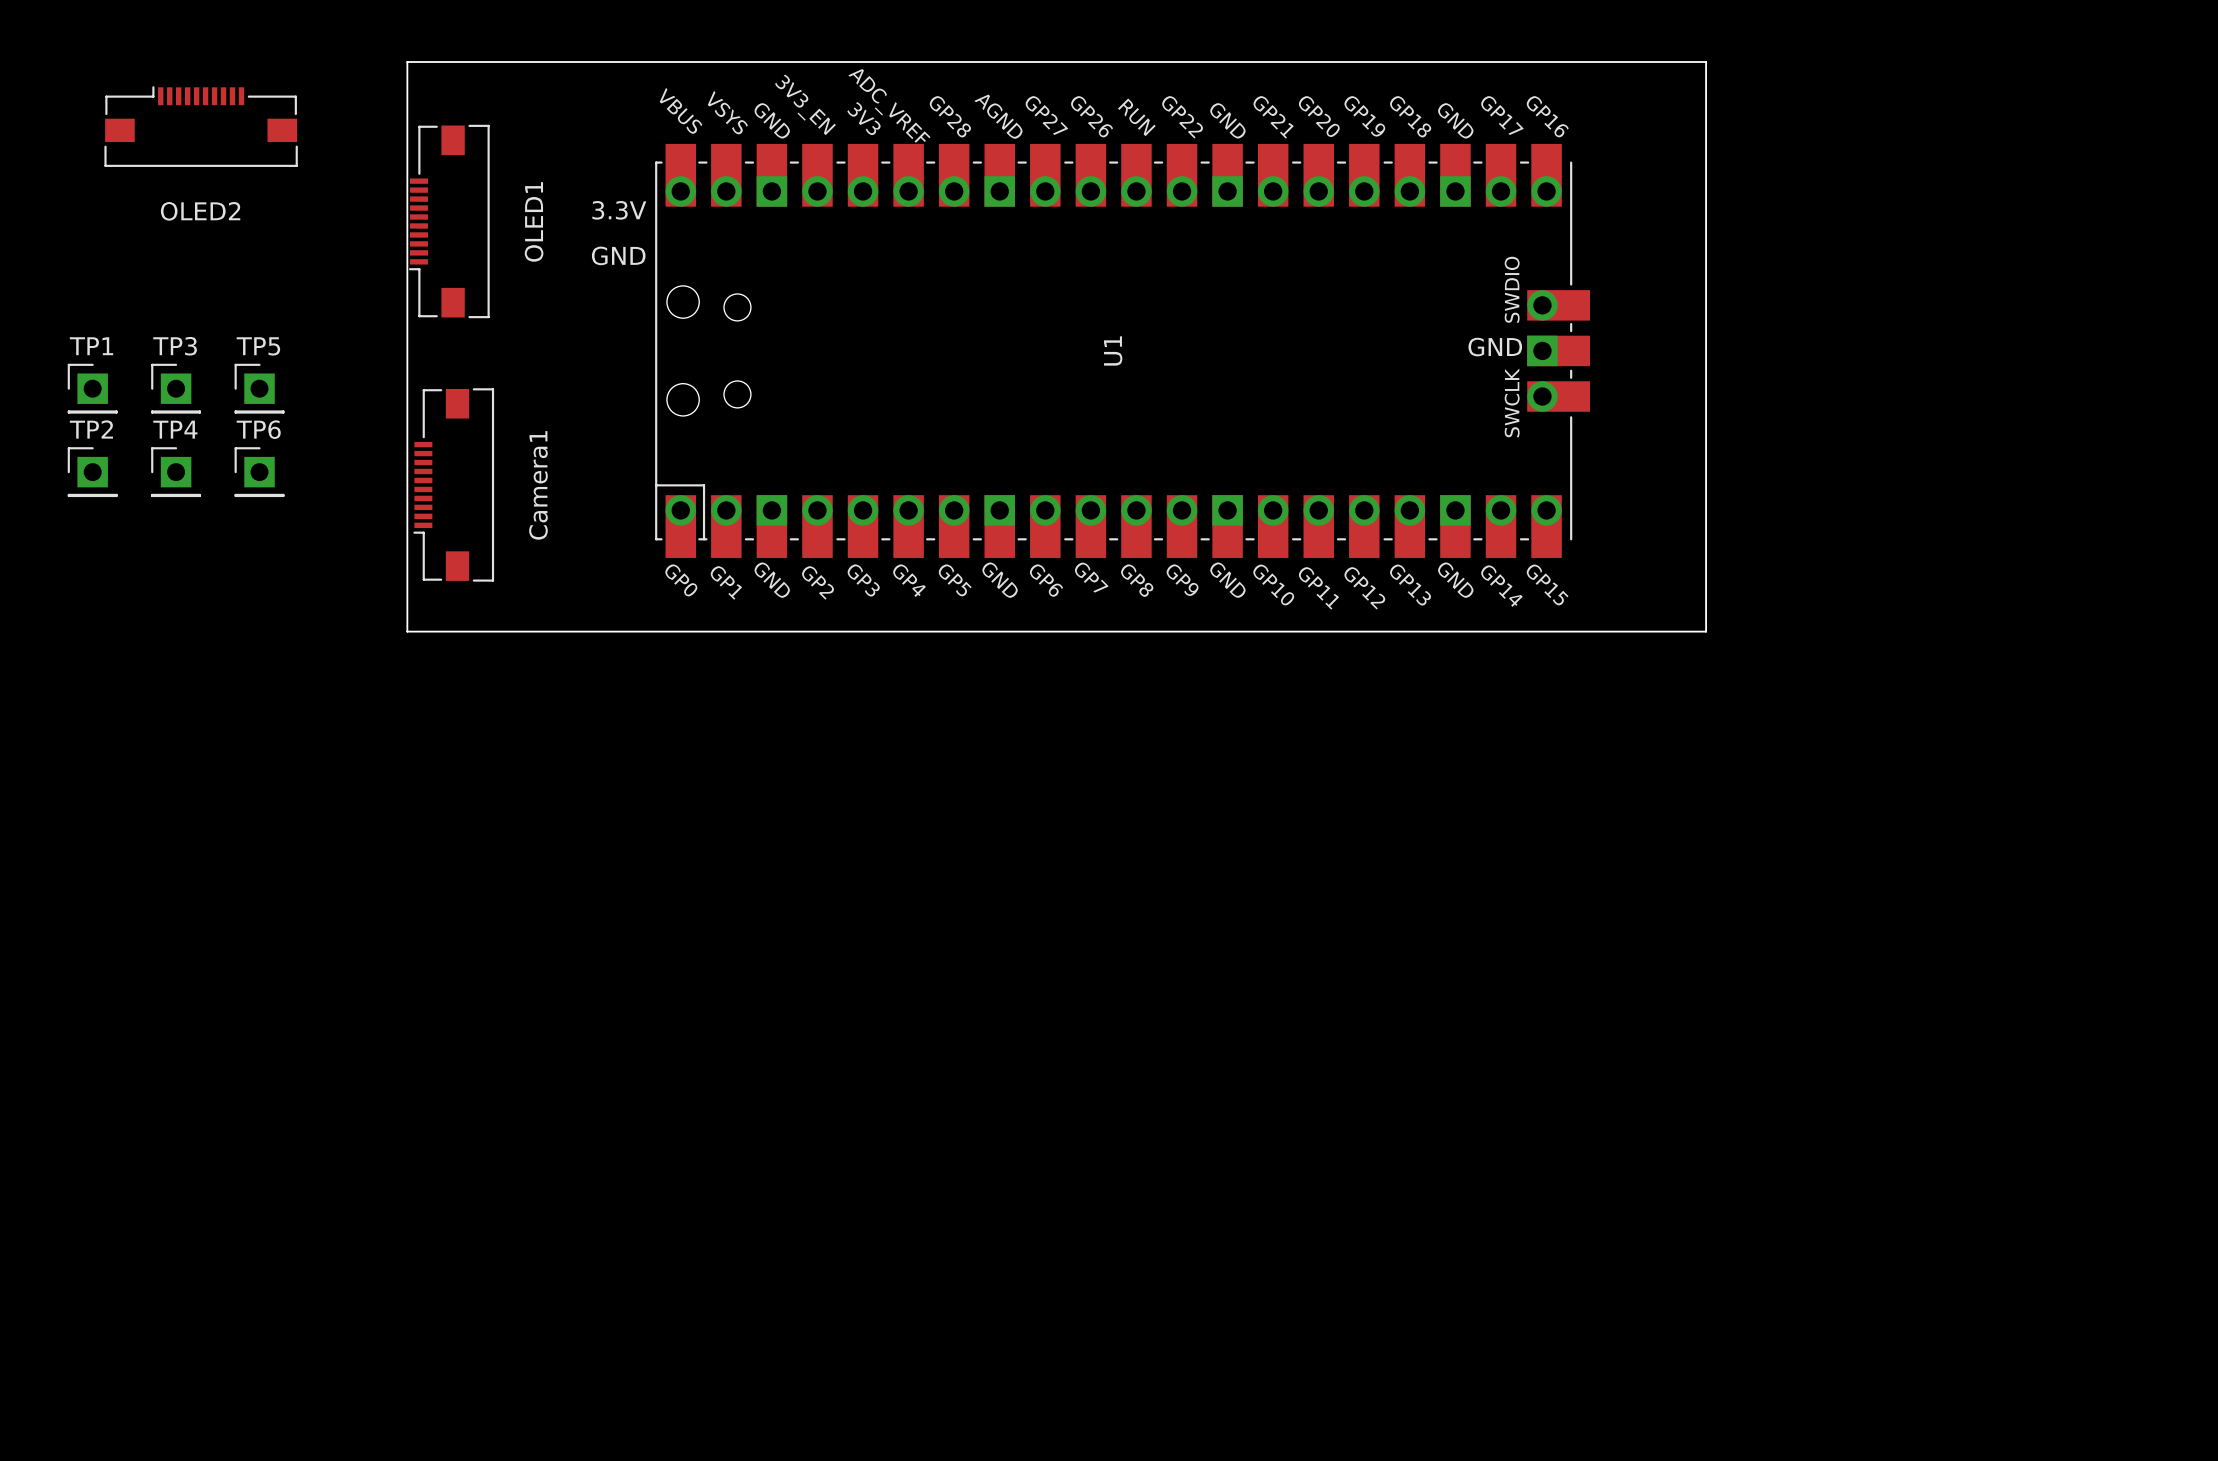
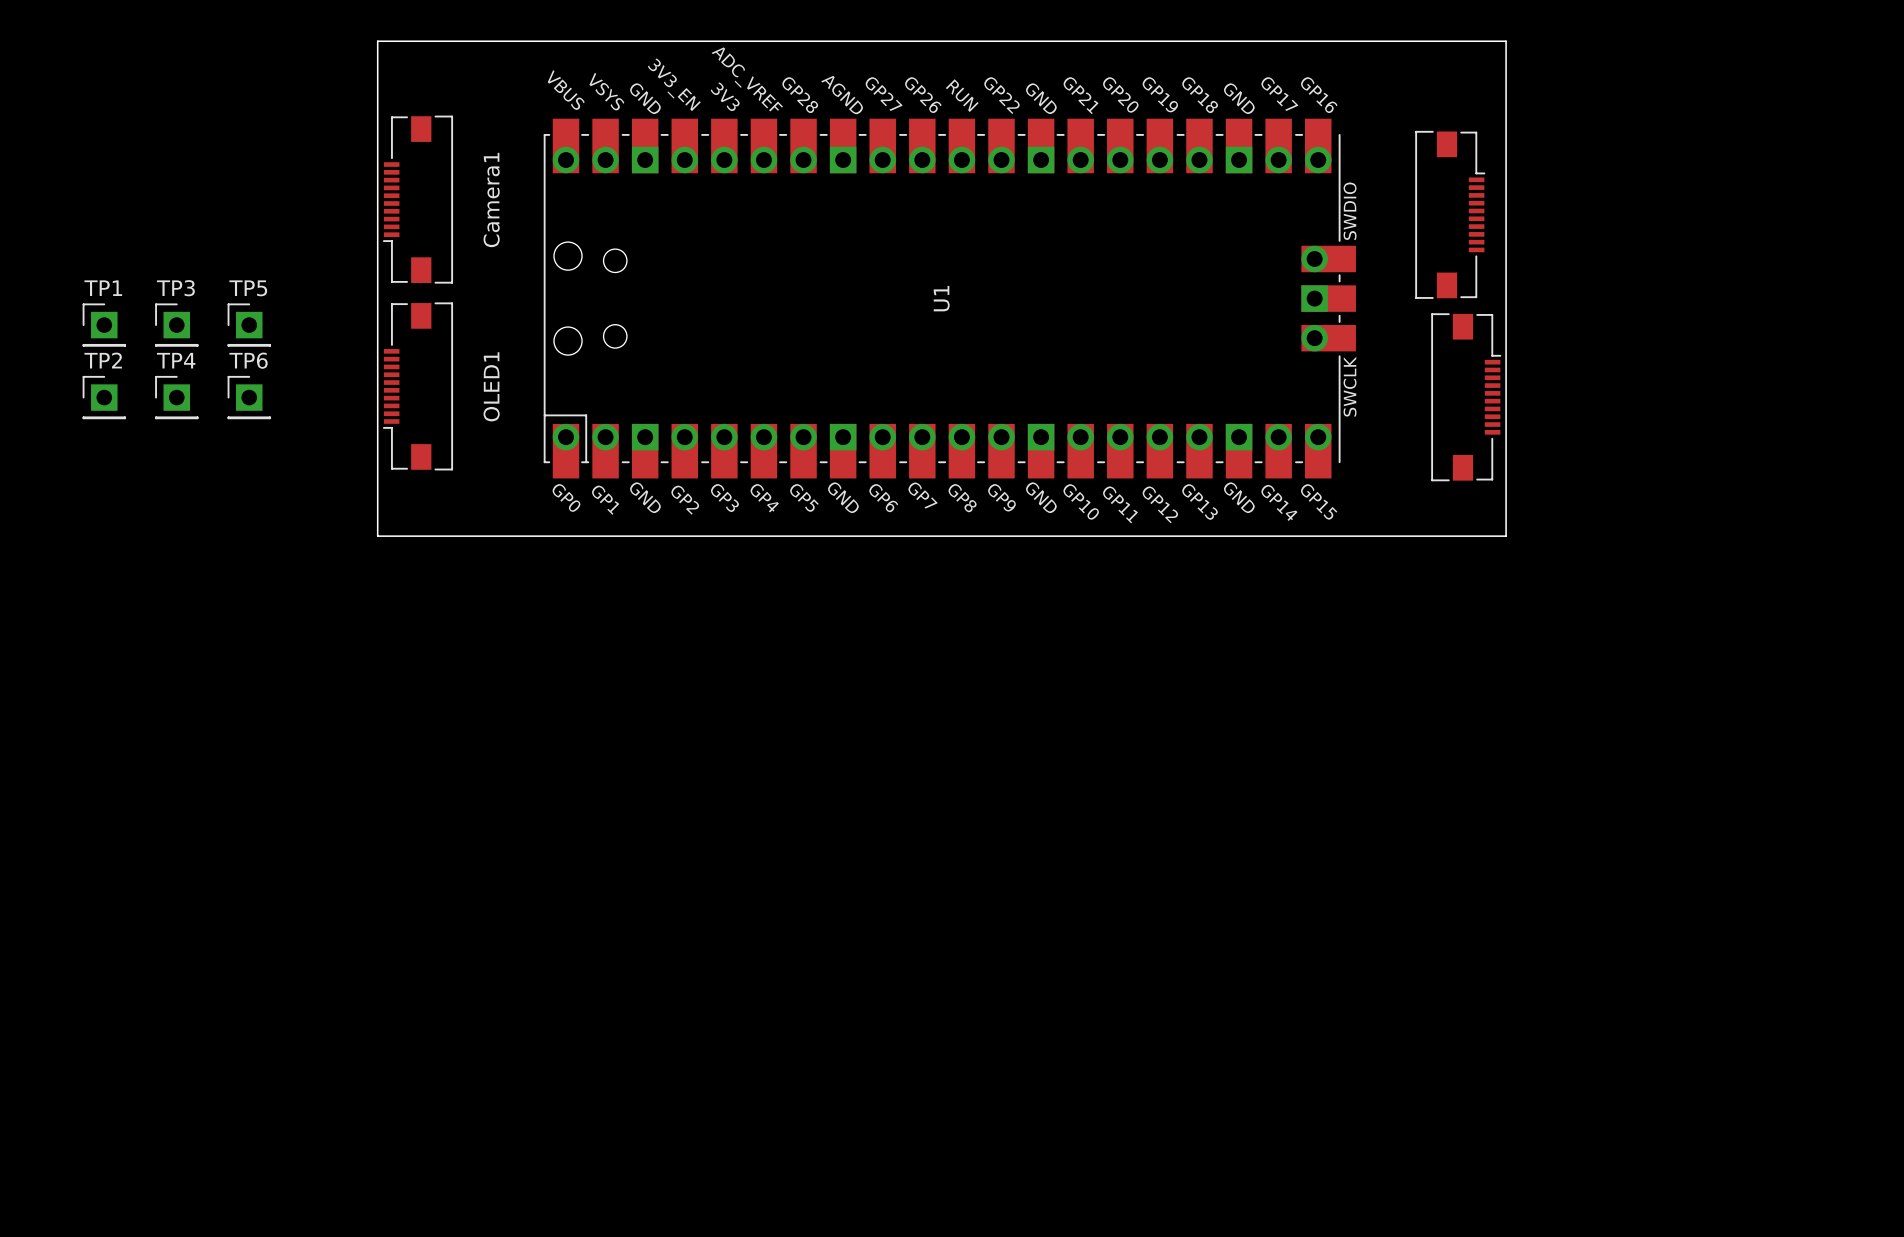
U1 text position: ADC_VREF (889, 105) -> ADC_VREF (747, 79)
part: OLED2 (201, 126) -> none
text: 3.3V (619, 210) -> none
part position: (449, 221) -> (417, 386)
text: GND (618, 255) -> none
part: none -> (1450, 214)
U1 text position: SWDIO (1512, 289) -> SWDIO (1350, 211)
text: GND (1495, 347) -> none
U1 position: (1122, 350) -> (949, 298)
U1 text position: SWCLK (1512, 402) -> SWCLK (1350, 386)
part: none -> (1466, 397)
part position: (453, 484) -> (417, 199)

